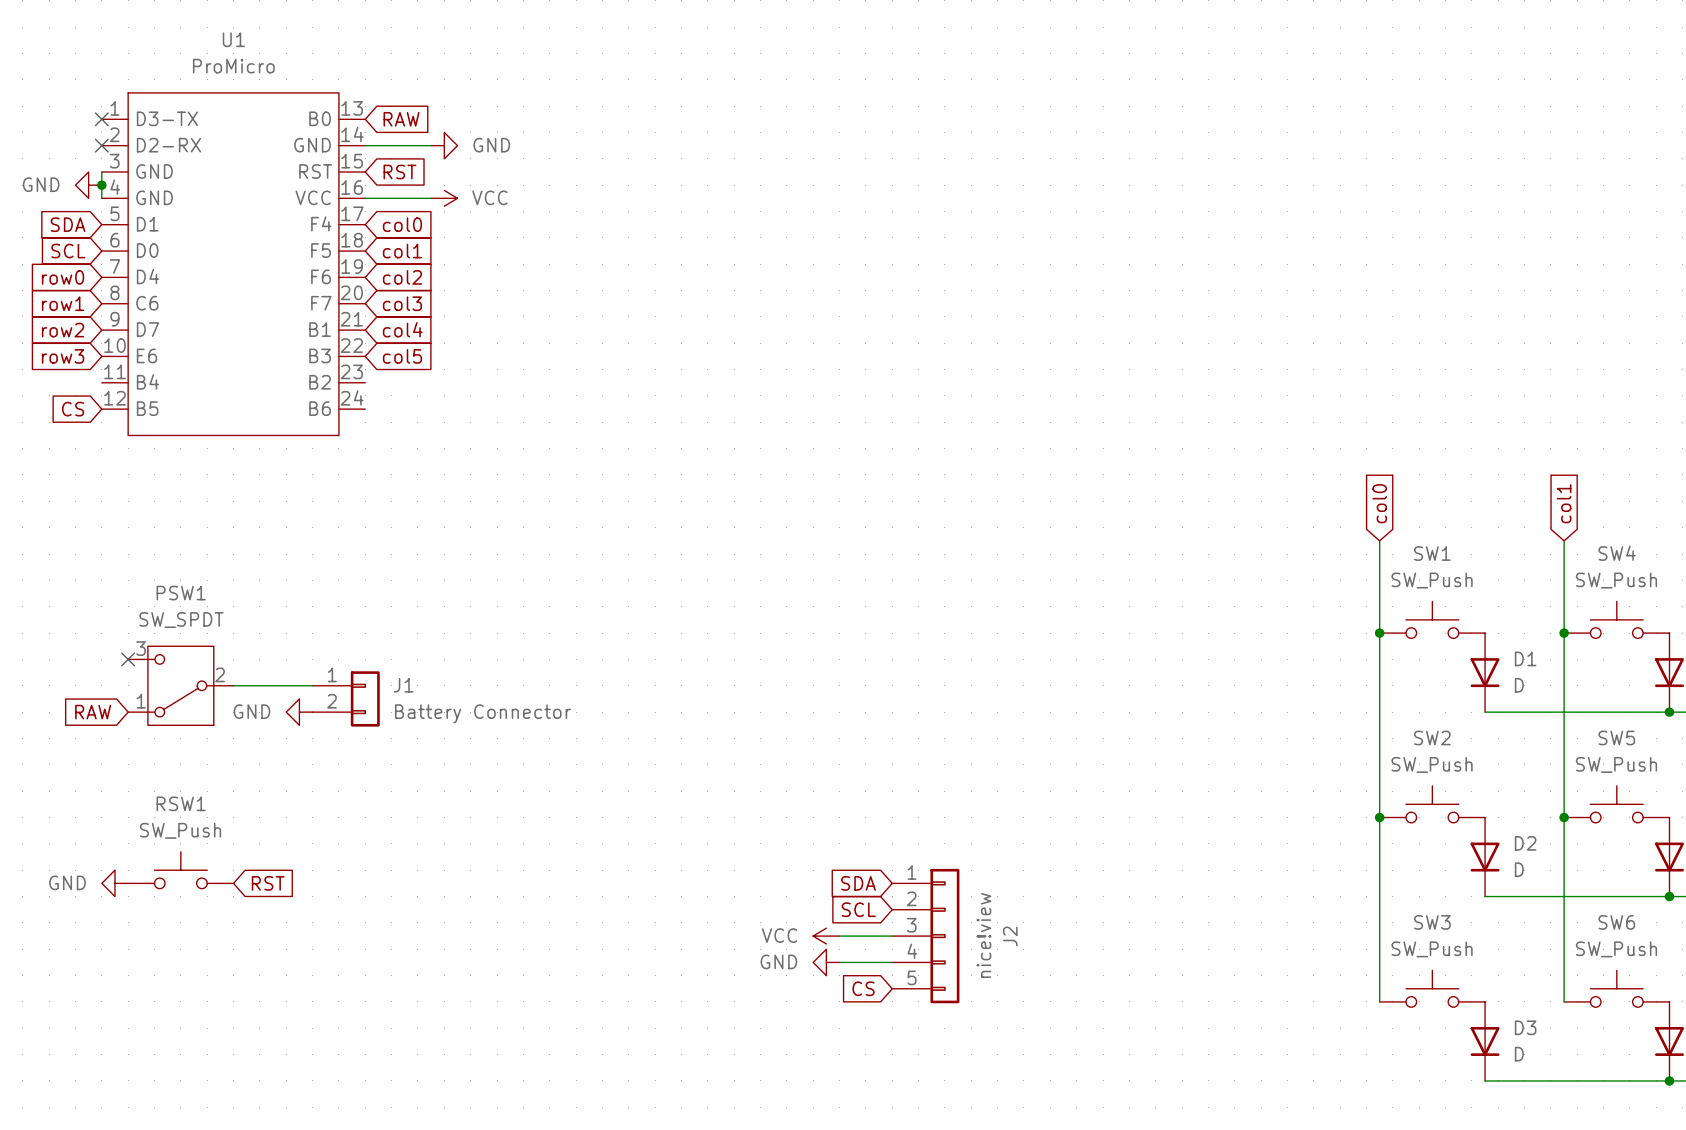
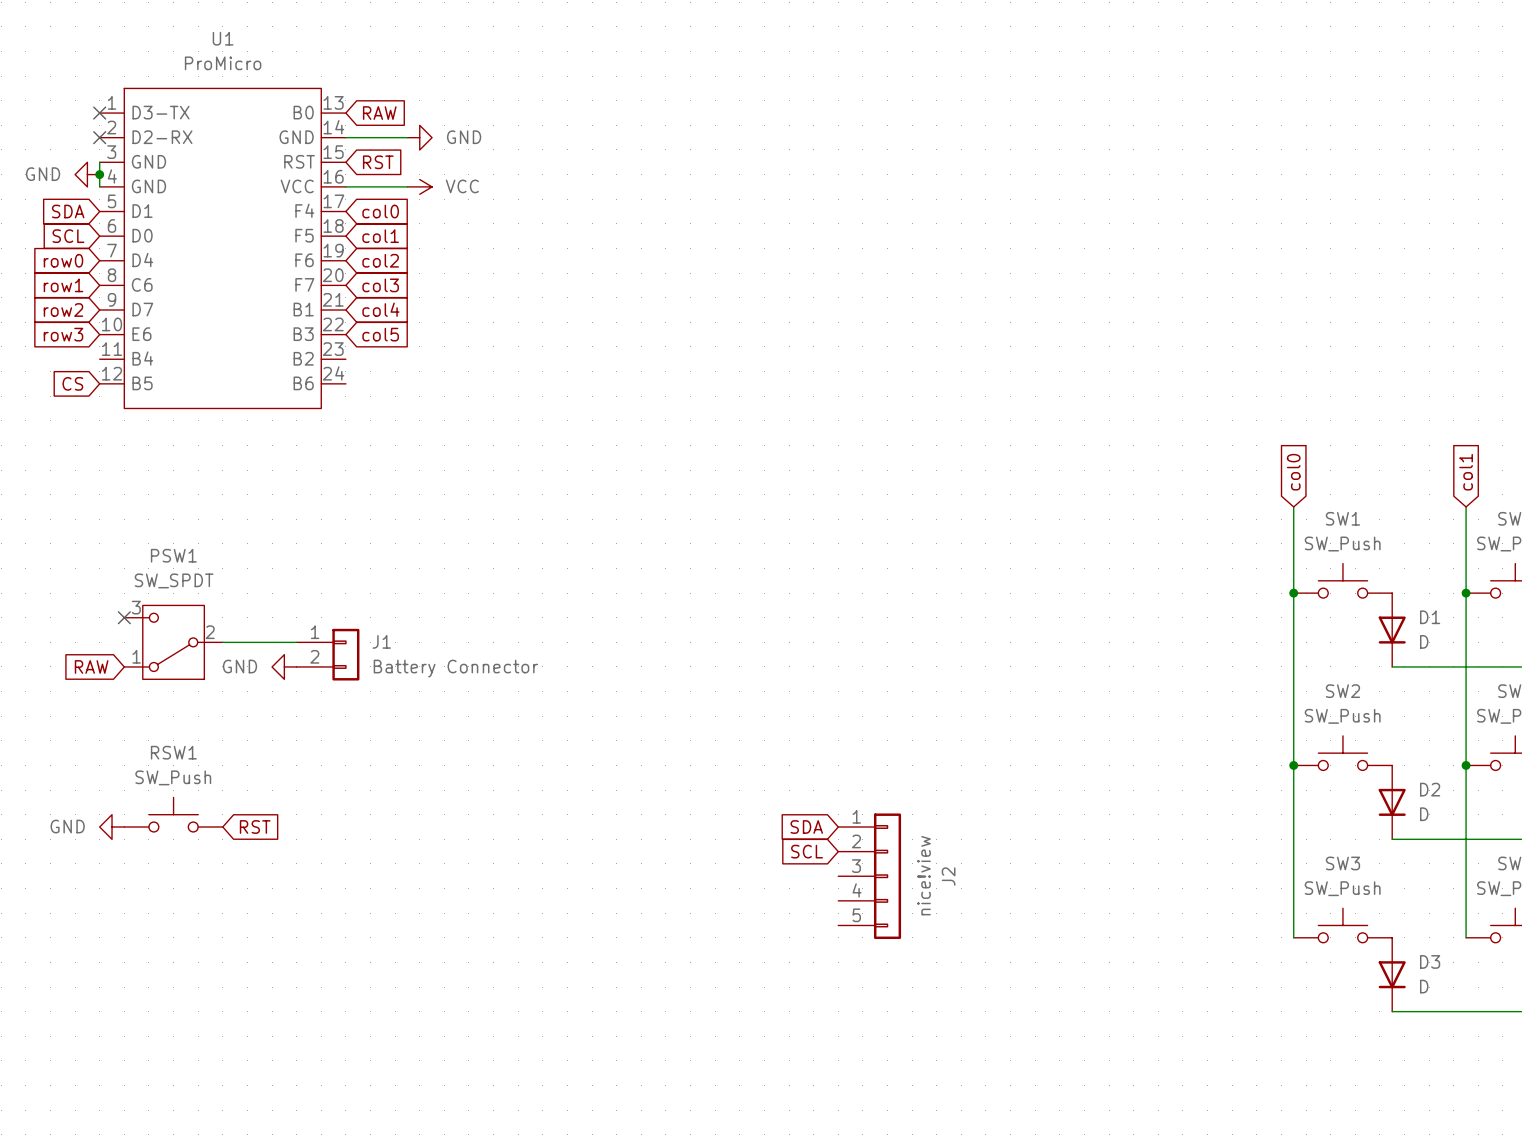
power symbol: VCC (826, 936) -> none
wire: (839, 936) (892, 936) -> none
power symbol: GND (826, 962) -> none
wire: (839, 962) (892, 962) -> none
global label: CS (863, 988) -> none

